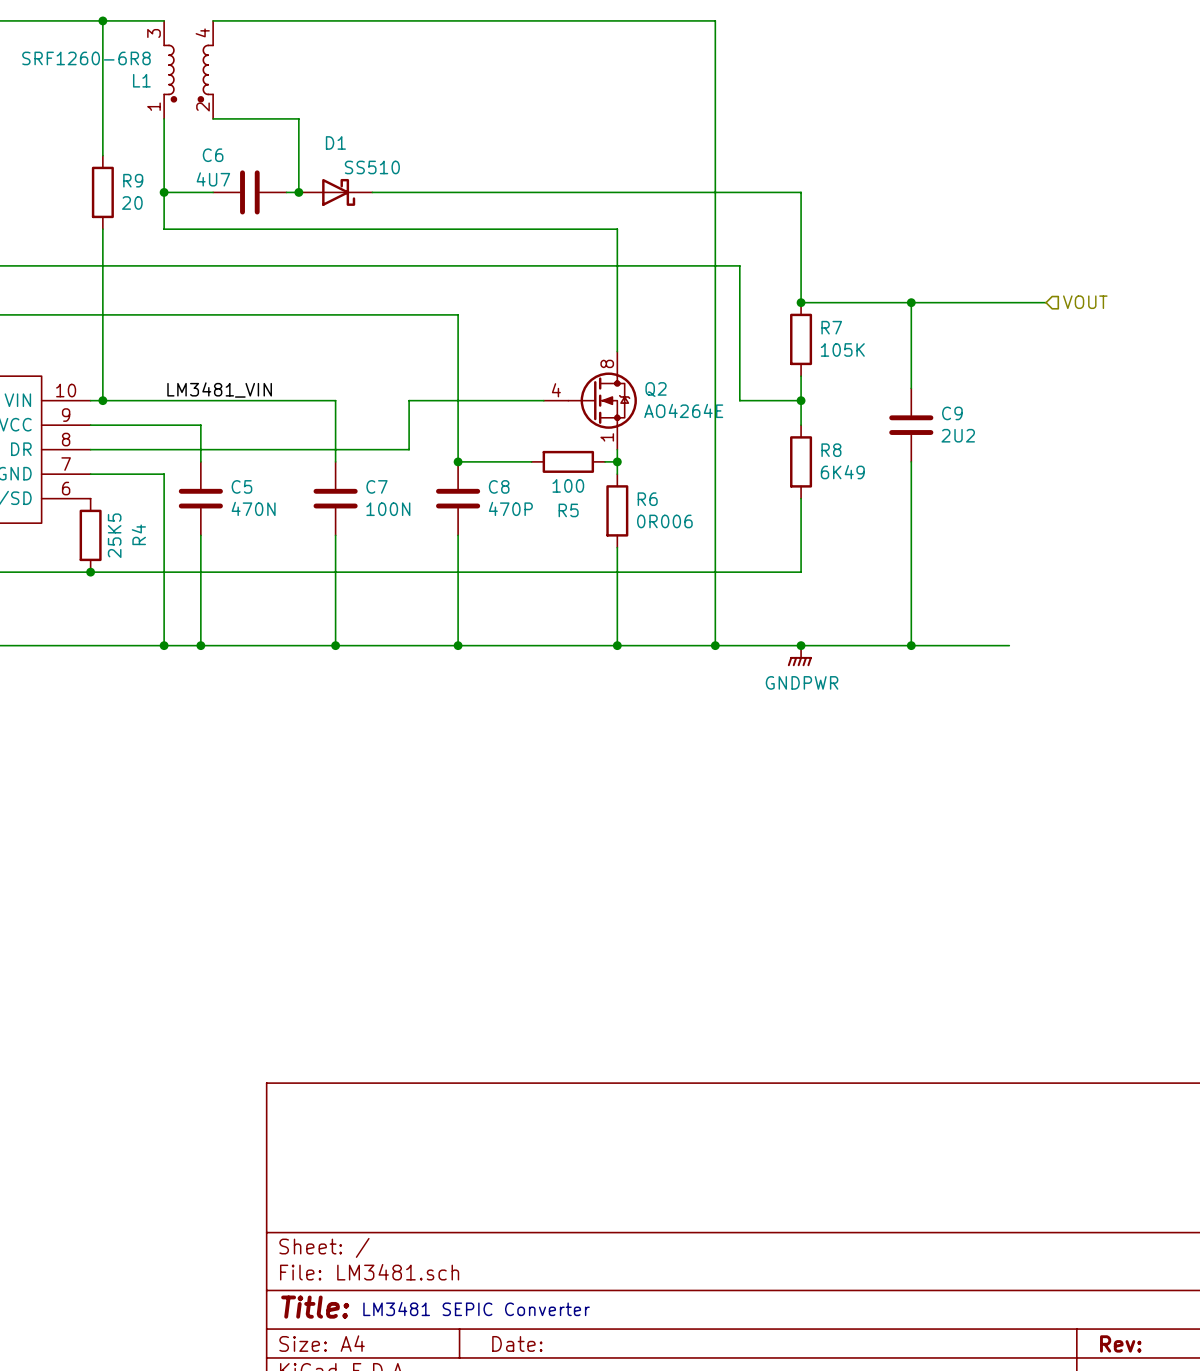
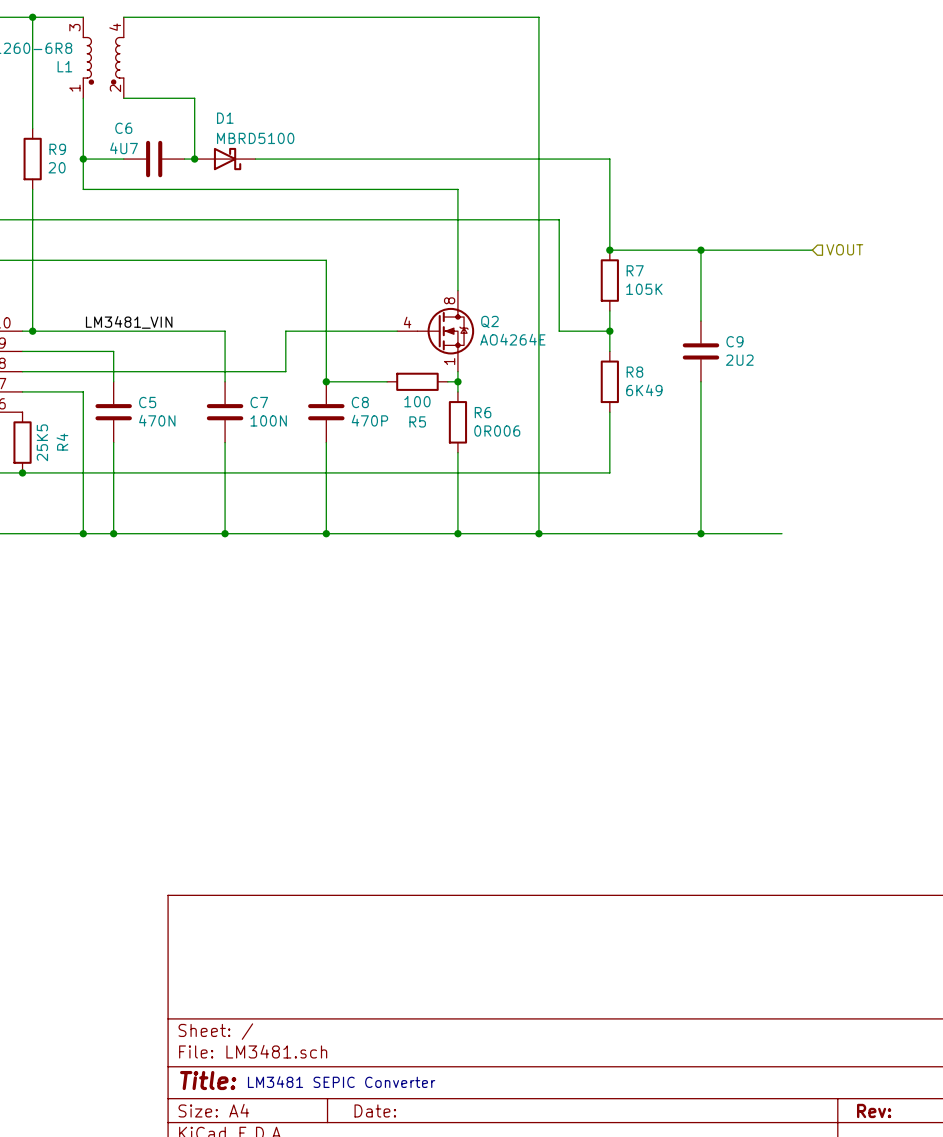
D1 value: SS510 (372, 167) -> MBRD5100 (255, 138)
junction: (801, 645) -> none
power symbol: GNDPWR (799, 655) -> none

